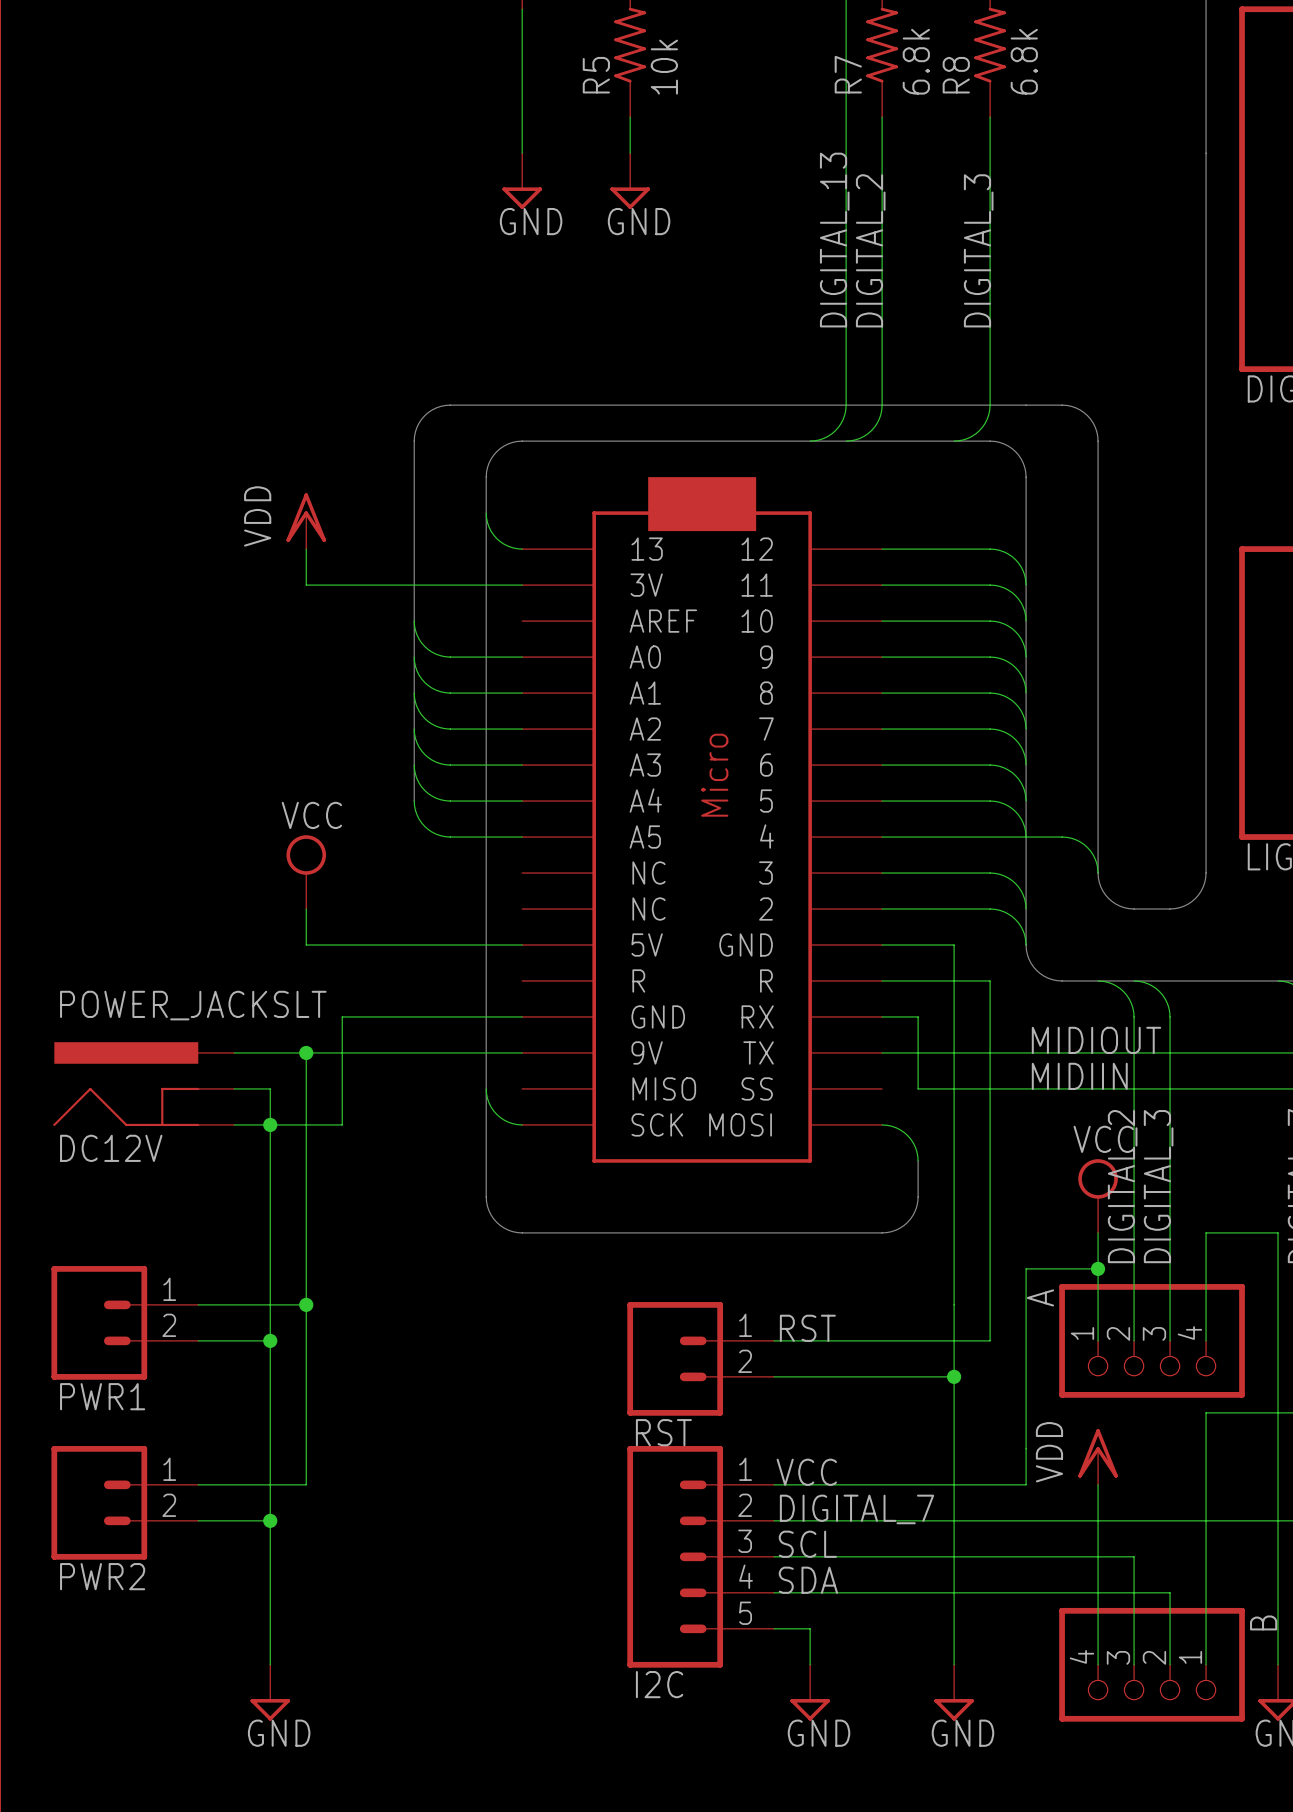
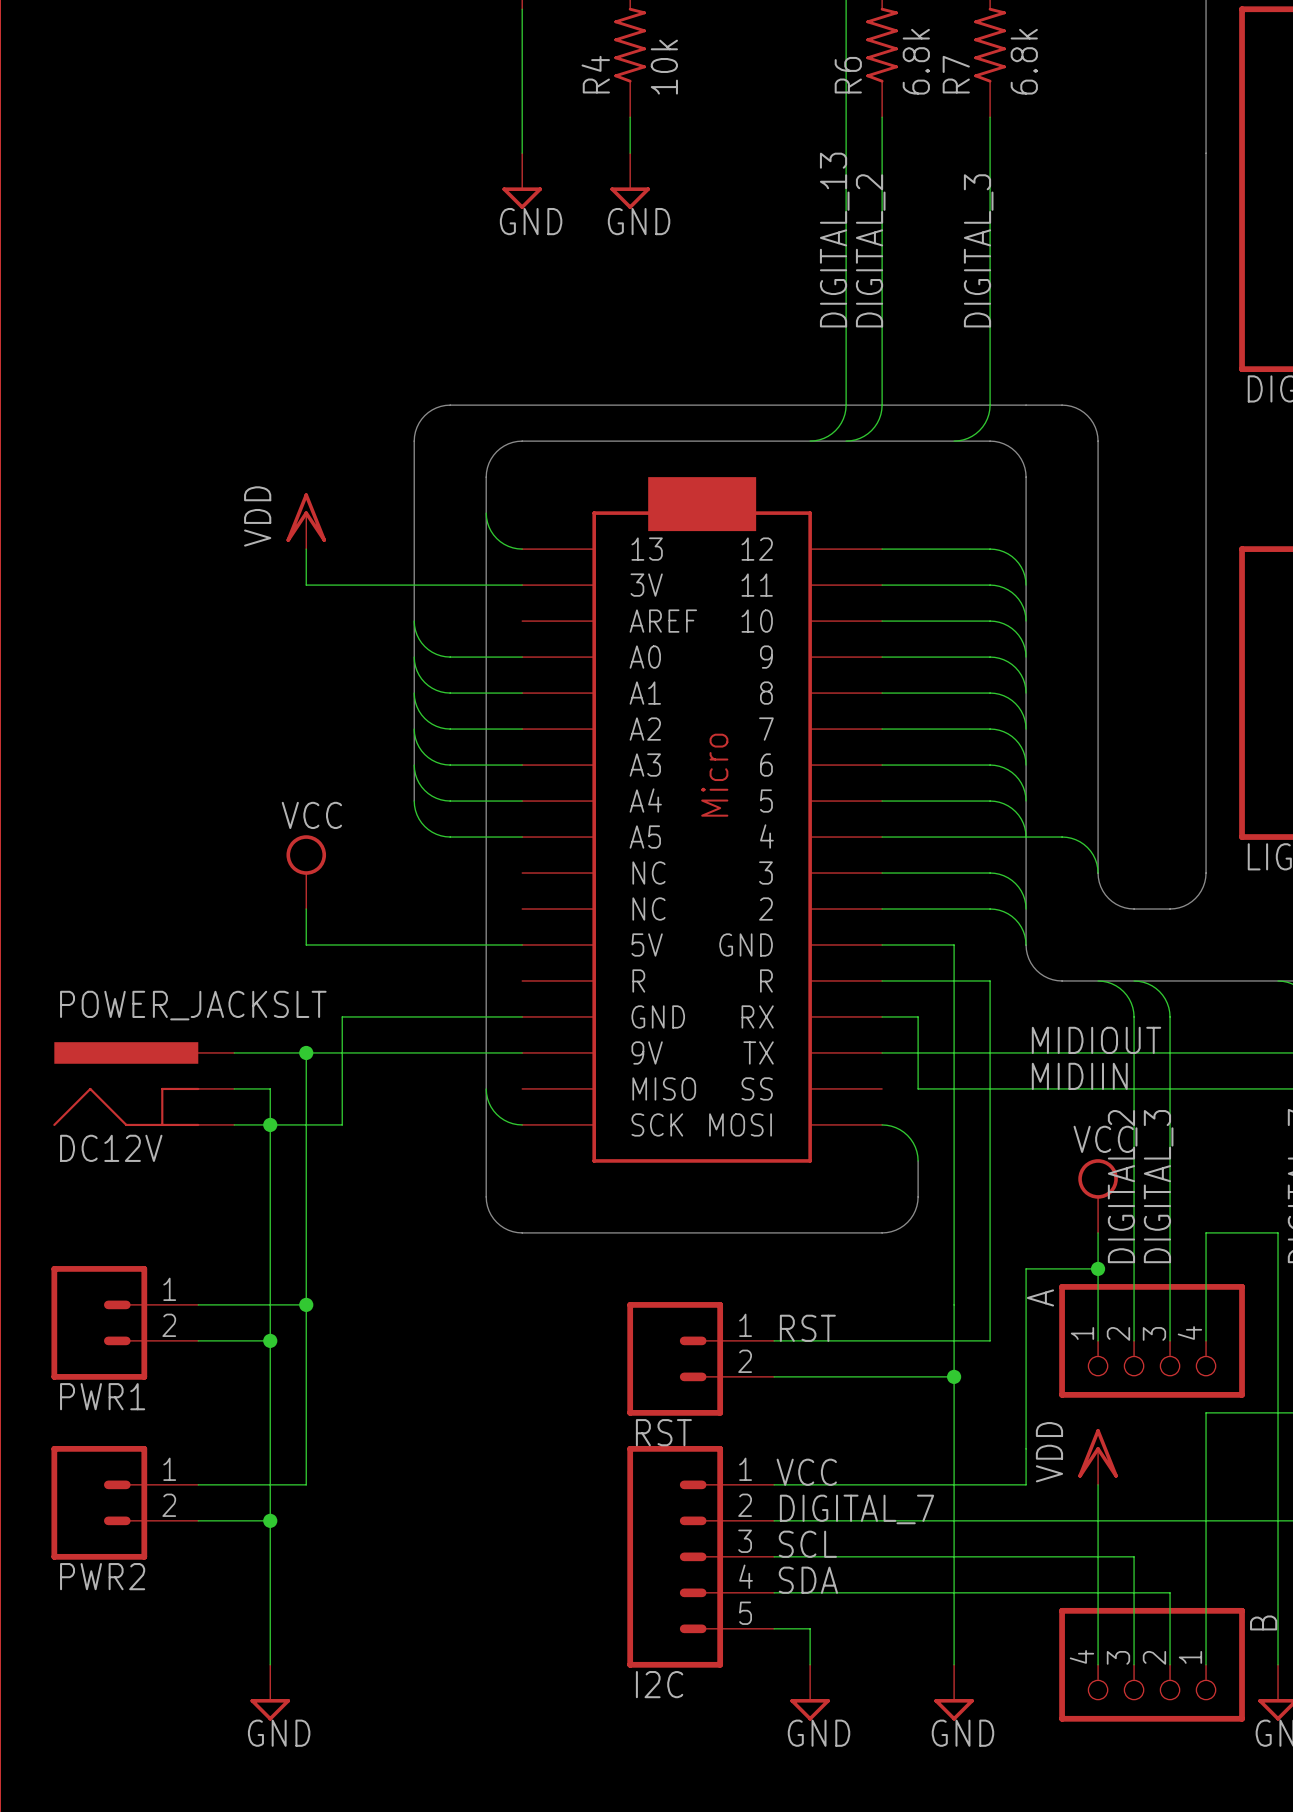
R7 name: R7 (848, 74) -> R6 (848, 75)
R5 name: R5 (596, 75) -> R4 (595, 74)
R8 name: R8 (956, 75) -> R7 (956, 74)

